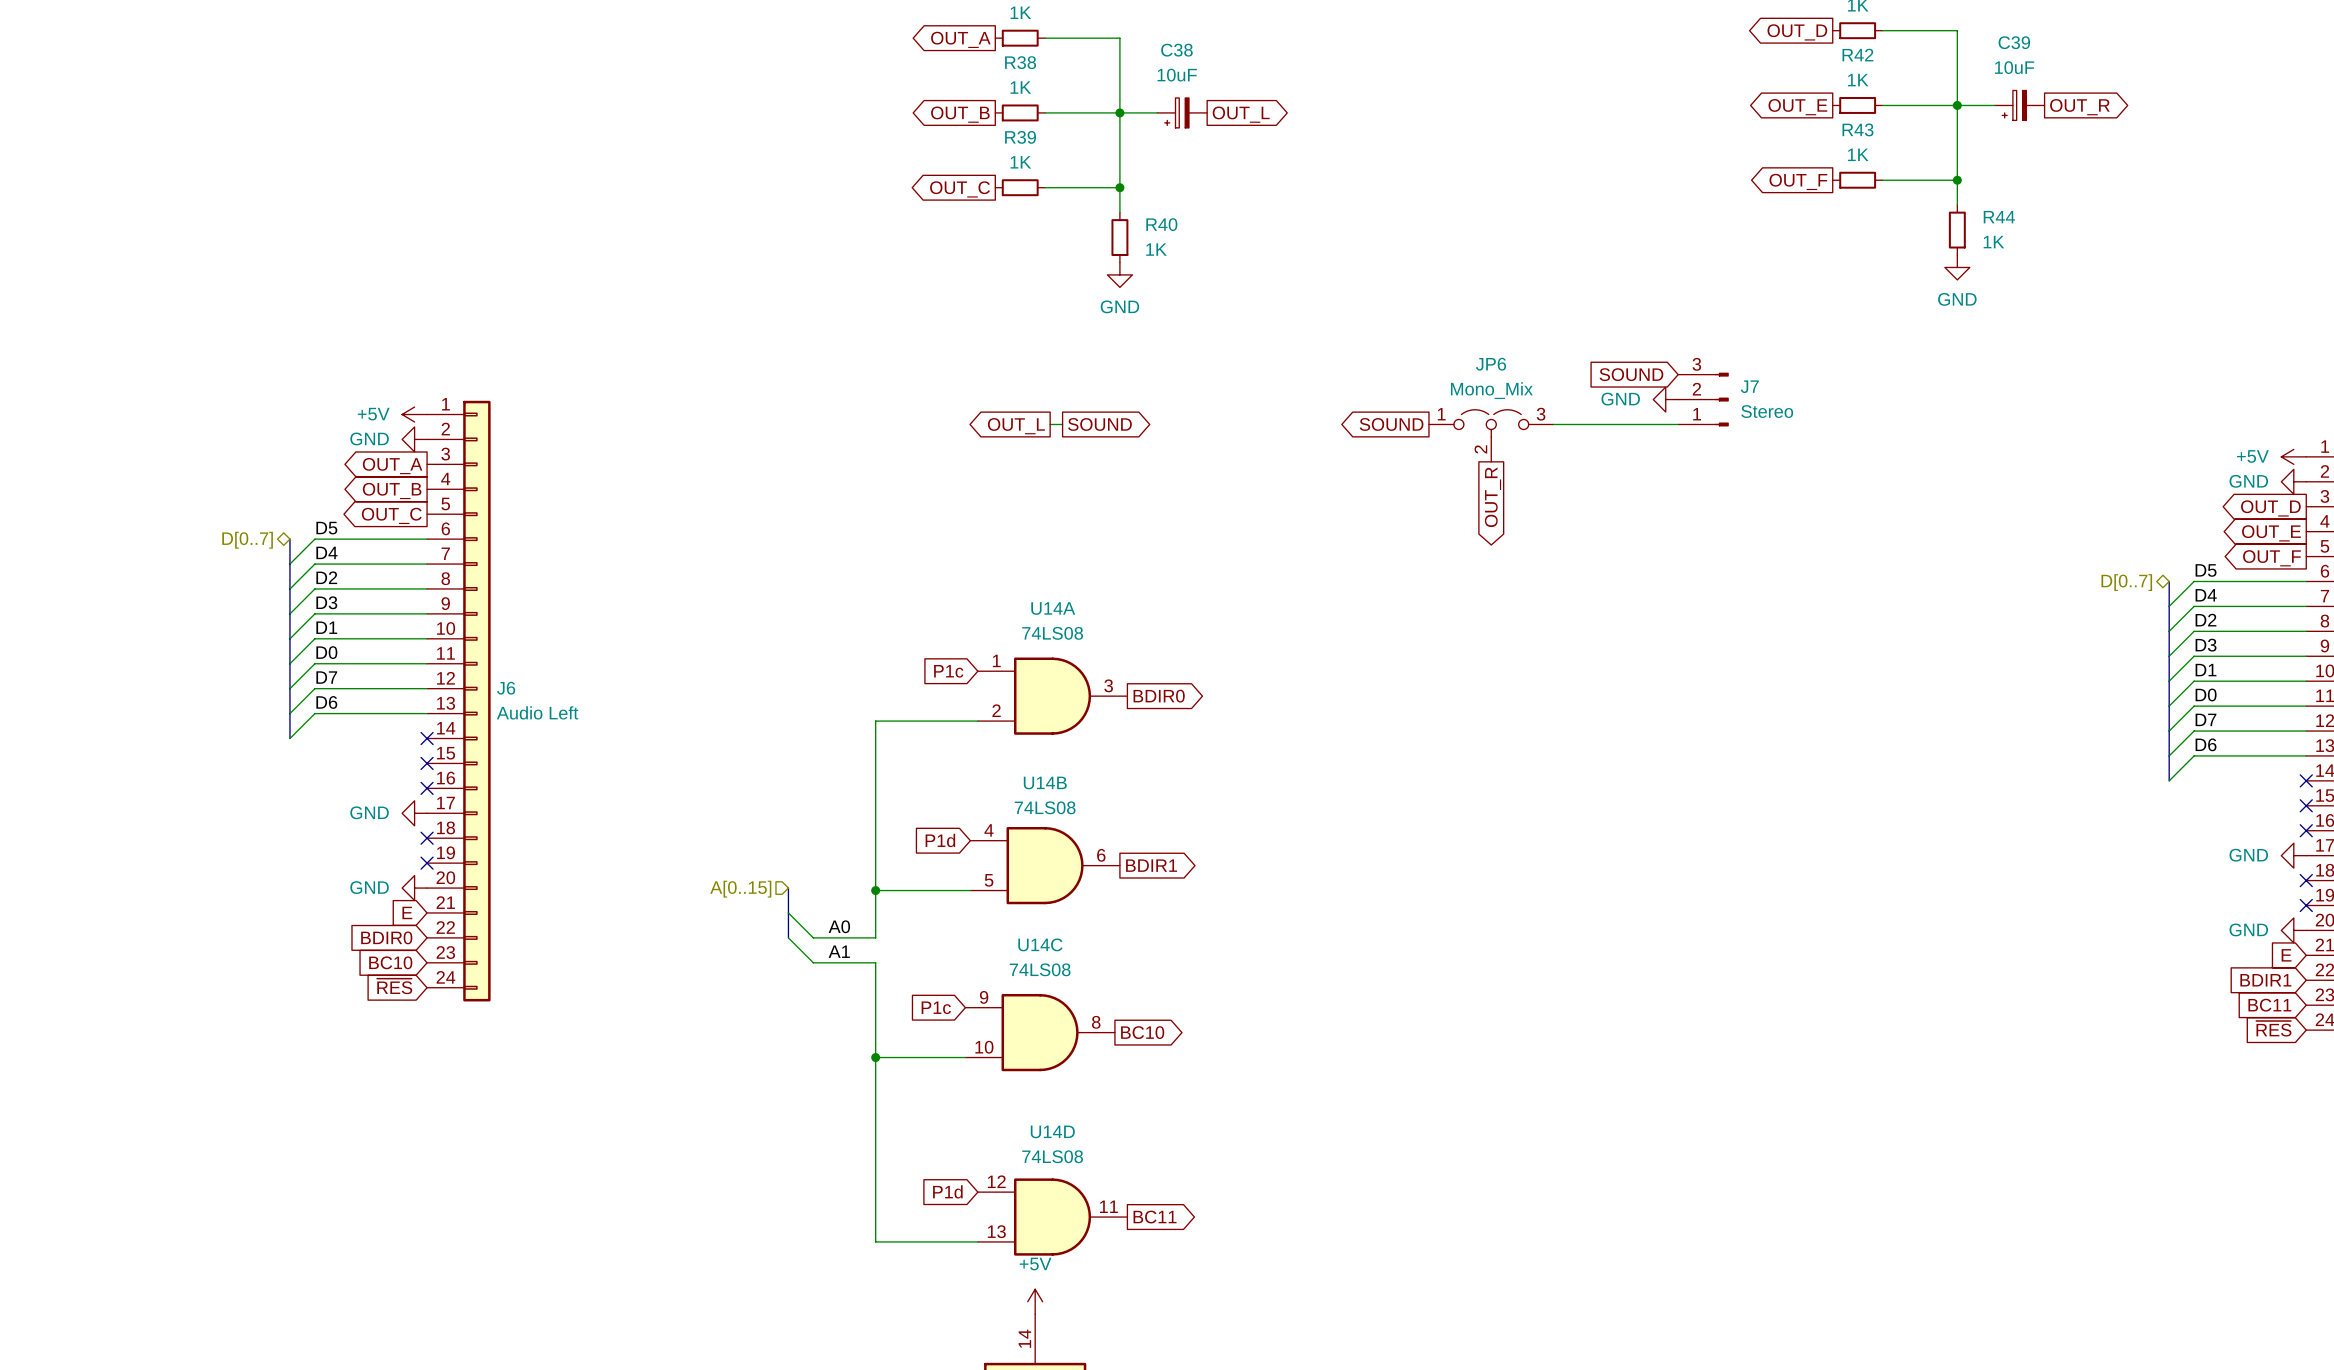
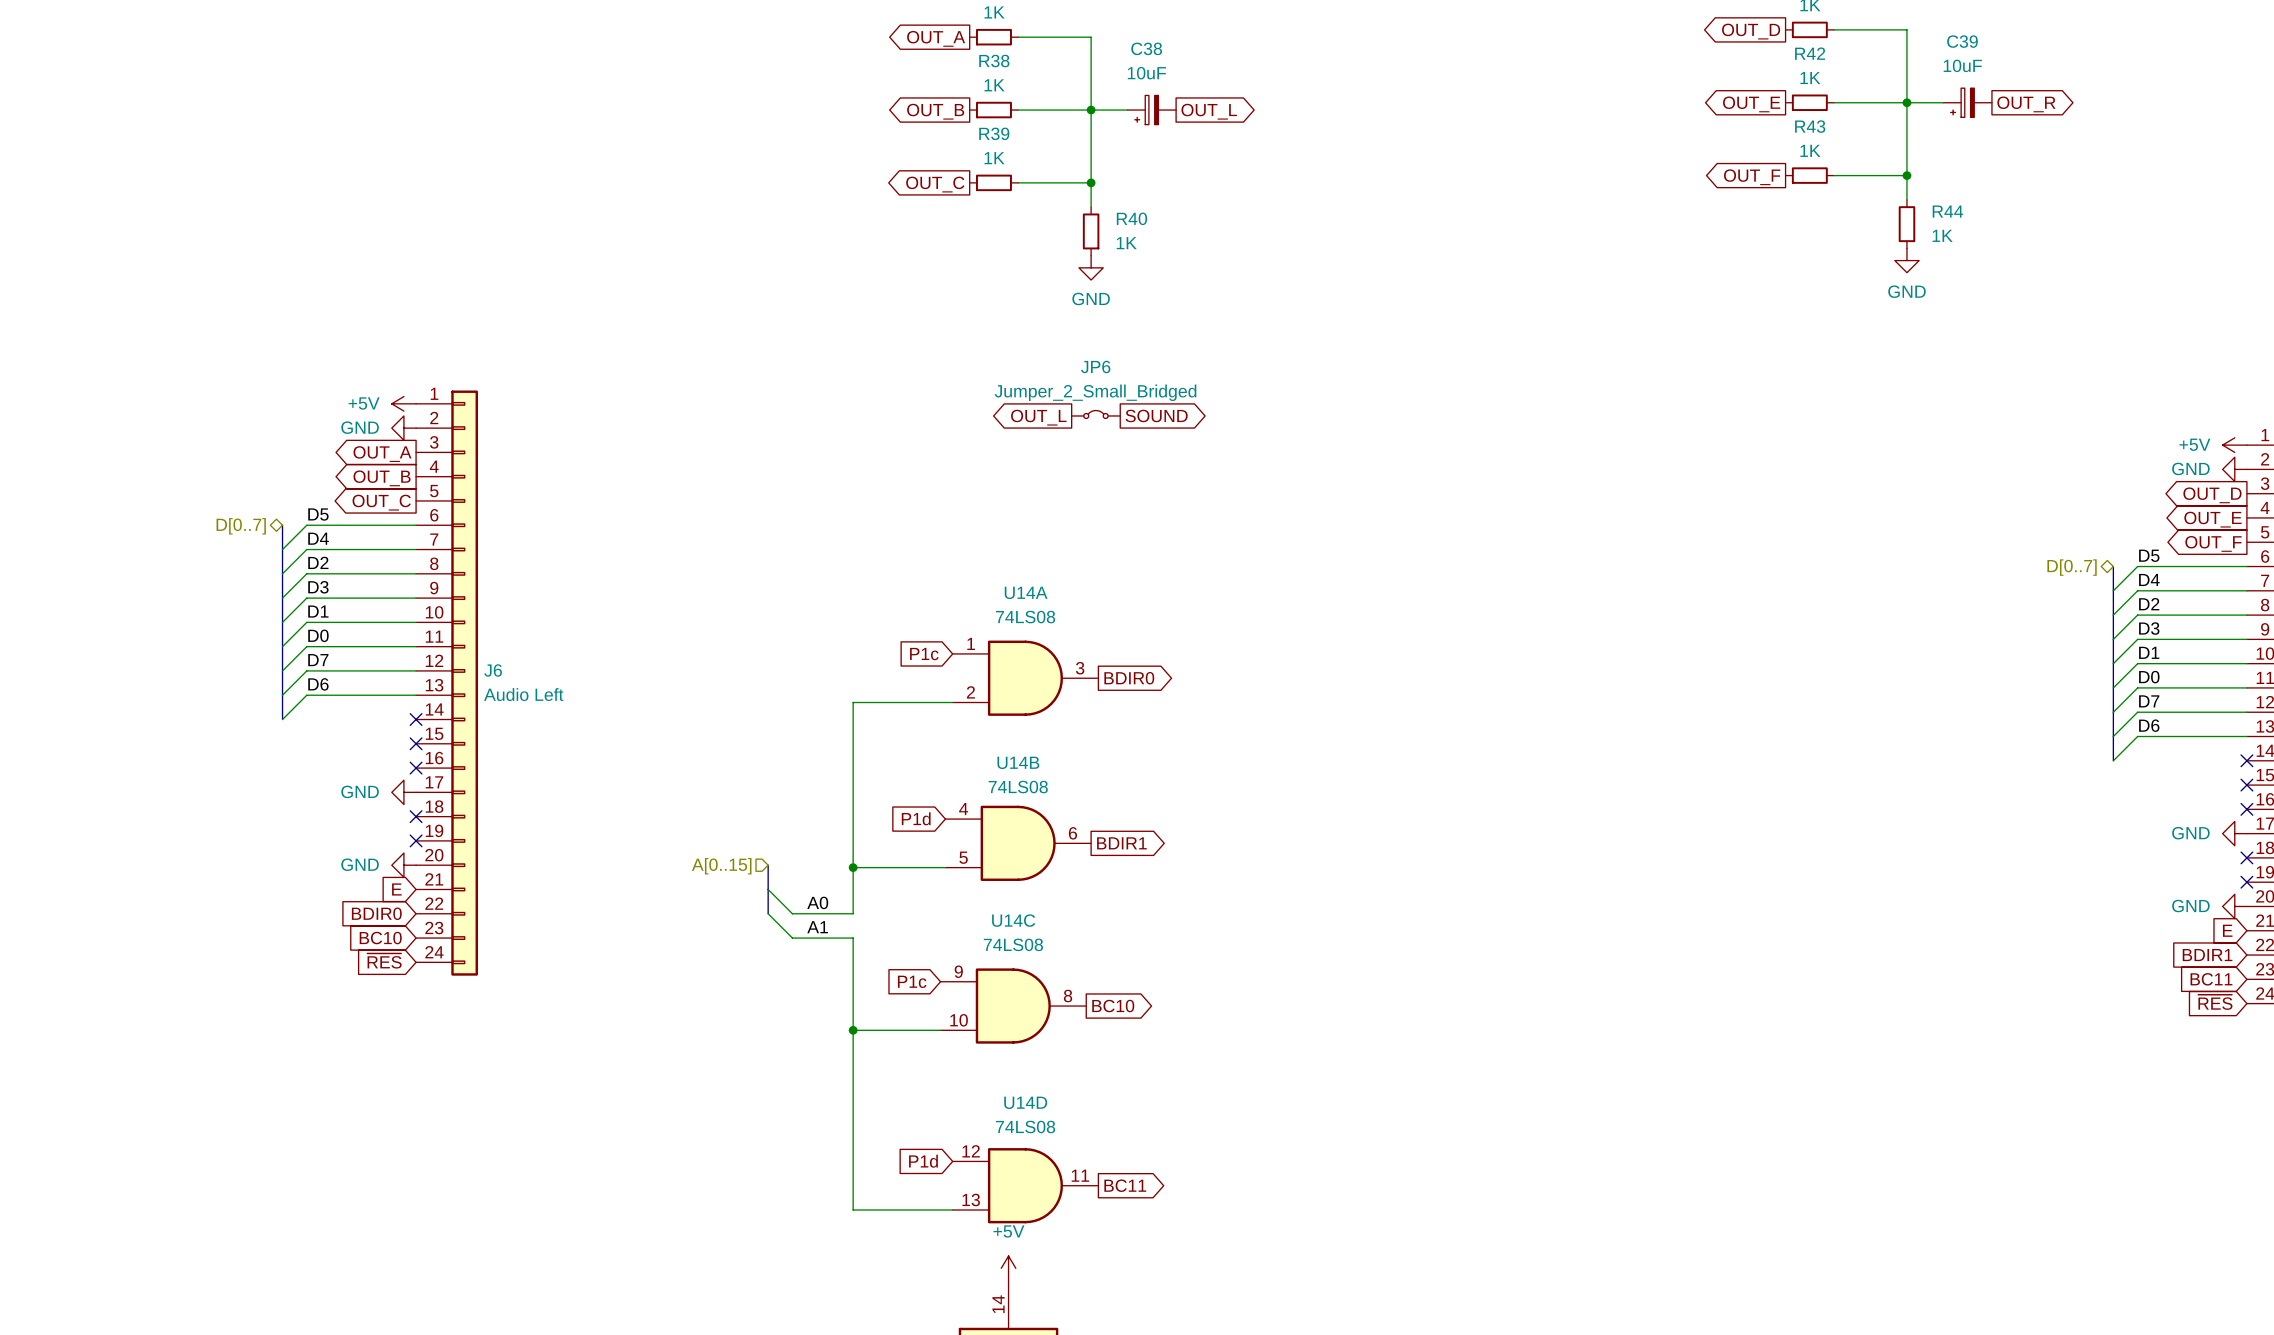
JP6 name position: JP6 (1491, 364) -> JP6 (1095, 366)
global label: SOUND (1631, 374) -> none
JP6 value: Mono_Mix (1491, 390) -> Jumper_2_Small_Bridged (1095, 392)
power symbol: GND (1665, 399) -> none
J7: Stereo (1703, 399) -> none
JP6 symbol: [1428, 409, 1554, 462] -> [1071, 410, 1121, 419]
wire: (1050, 424) (1062, 424) -> none
global label position: SOUND (1099, 424) -> SOUND (1156, 415)
global label: SOUND (1391, 424) -> none
wire: (1553, 424) (1678, 424) -> none
global label position: OUT_L (1016, 426) -> OUT_L (1038, 417)
global label: OUT_R (1492, 497) -> none

